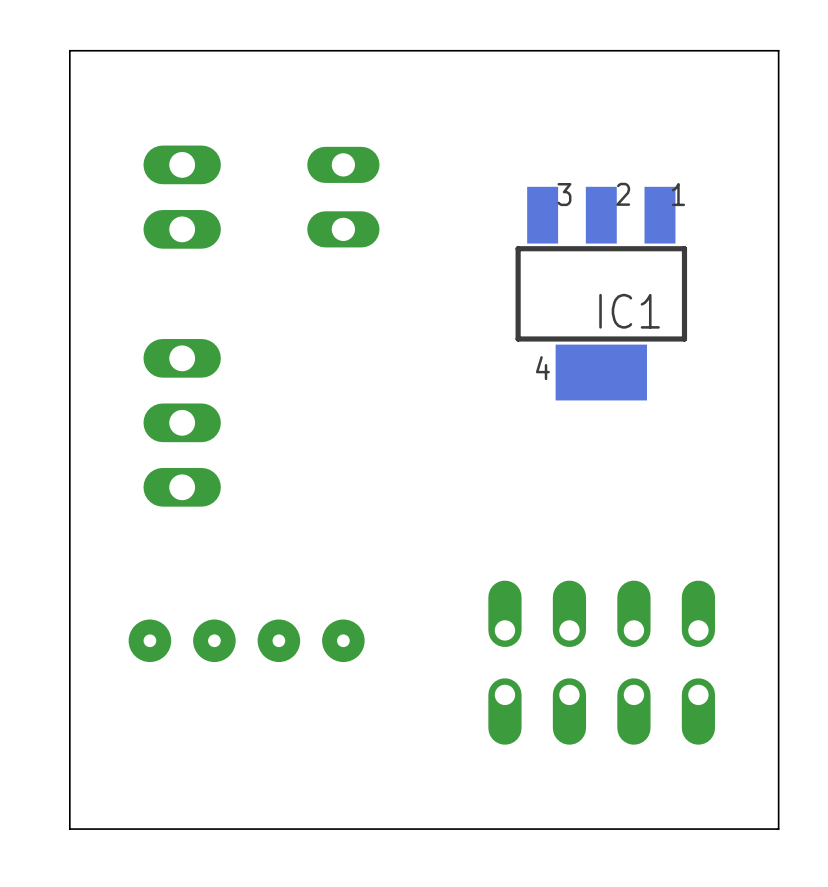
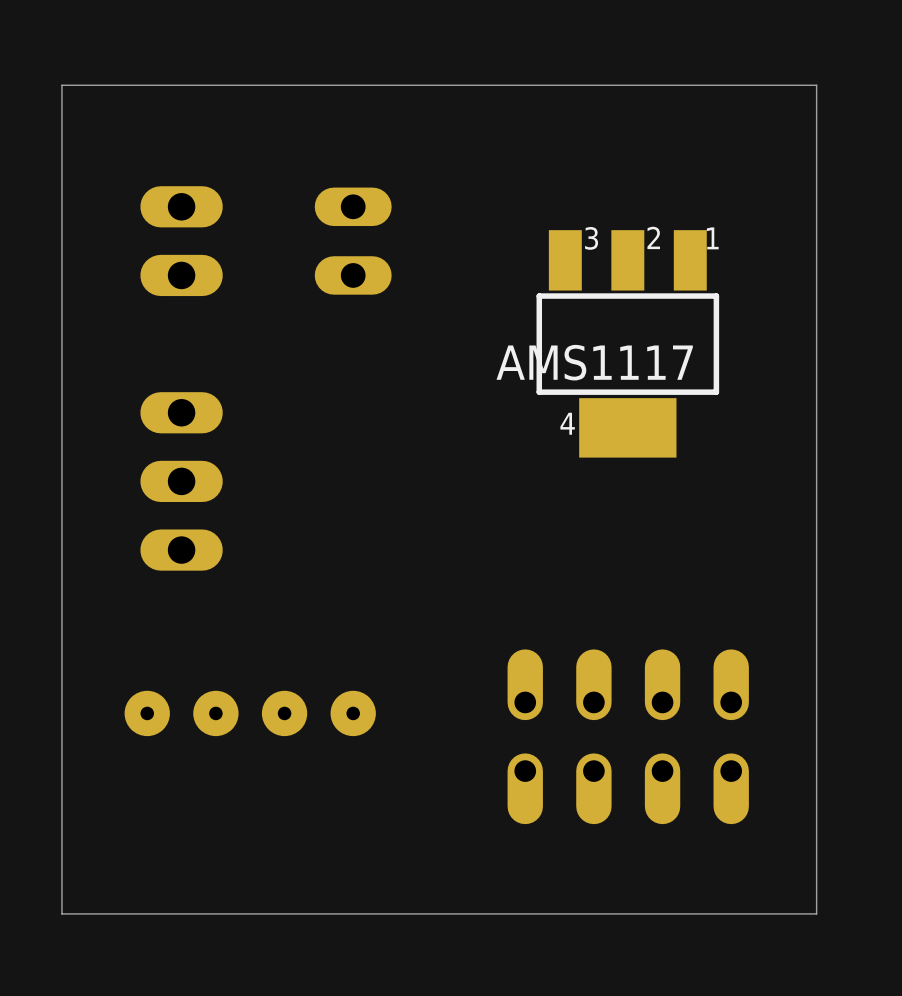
IC1 name: IC1 (629, 311) -> AMS1117 (594, 362)

